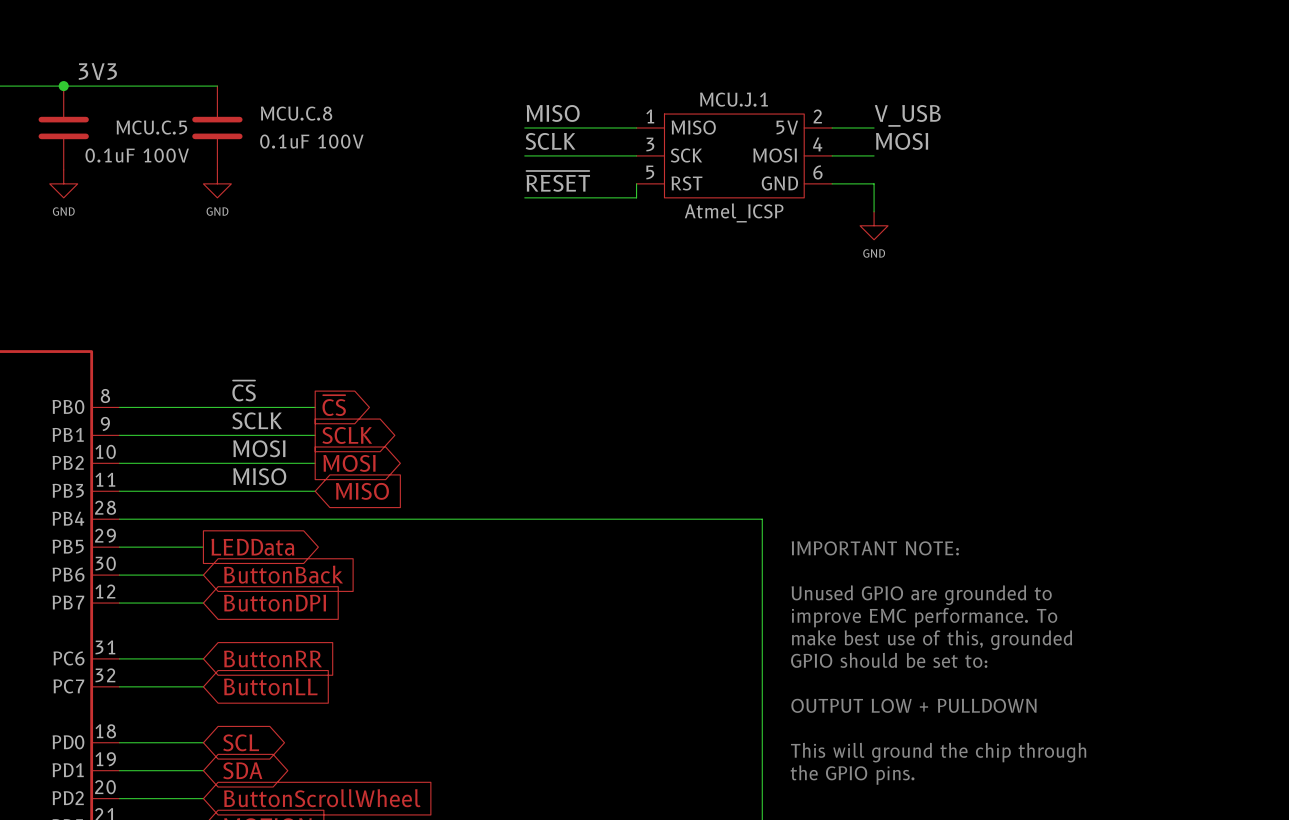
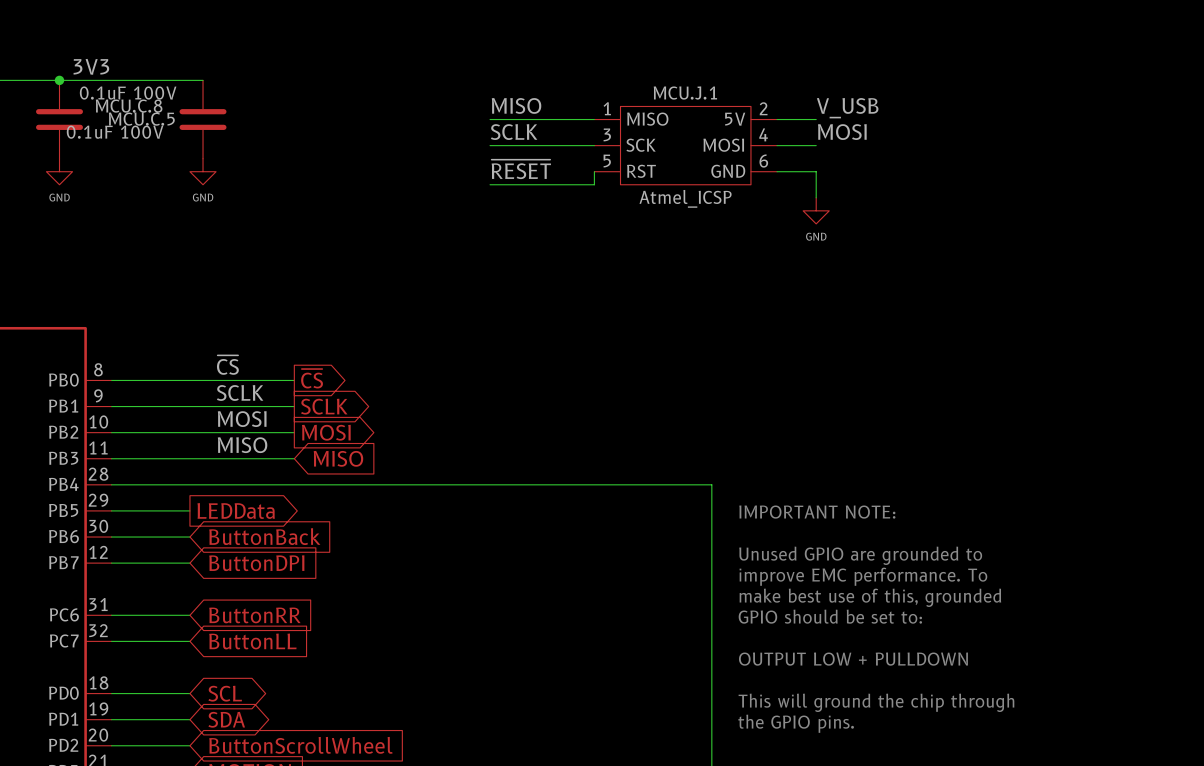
MCU.C.8 name position: MCU.C.8 (296, 113) -> MCU.C.8 (129, 106)
MCU.C.8 value position: 0.1uF 100V (311, 141) -> 0.1uF 100V (115, 132)
MCU.C.5 value position: 0.1uF 100V (137, 155) -> 0.1uF 100V (128, 93)

